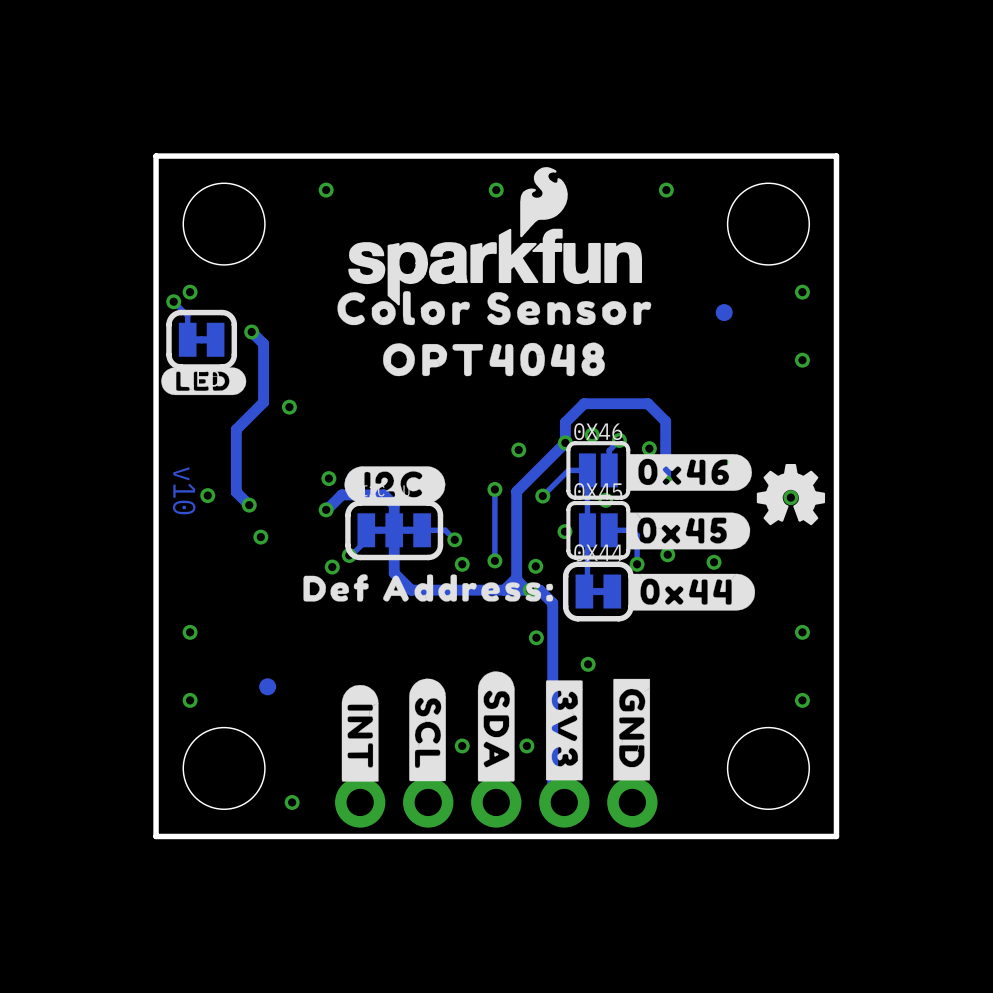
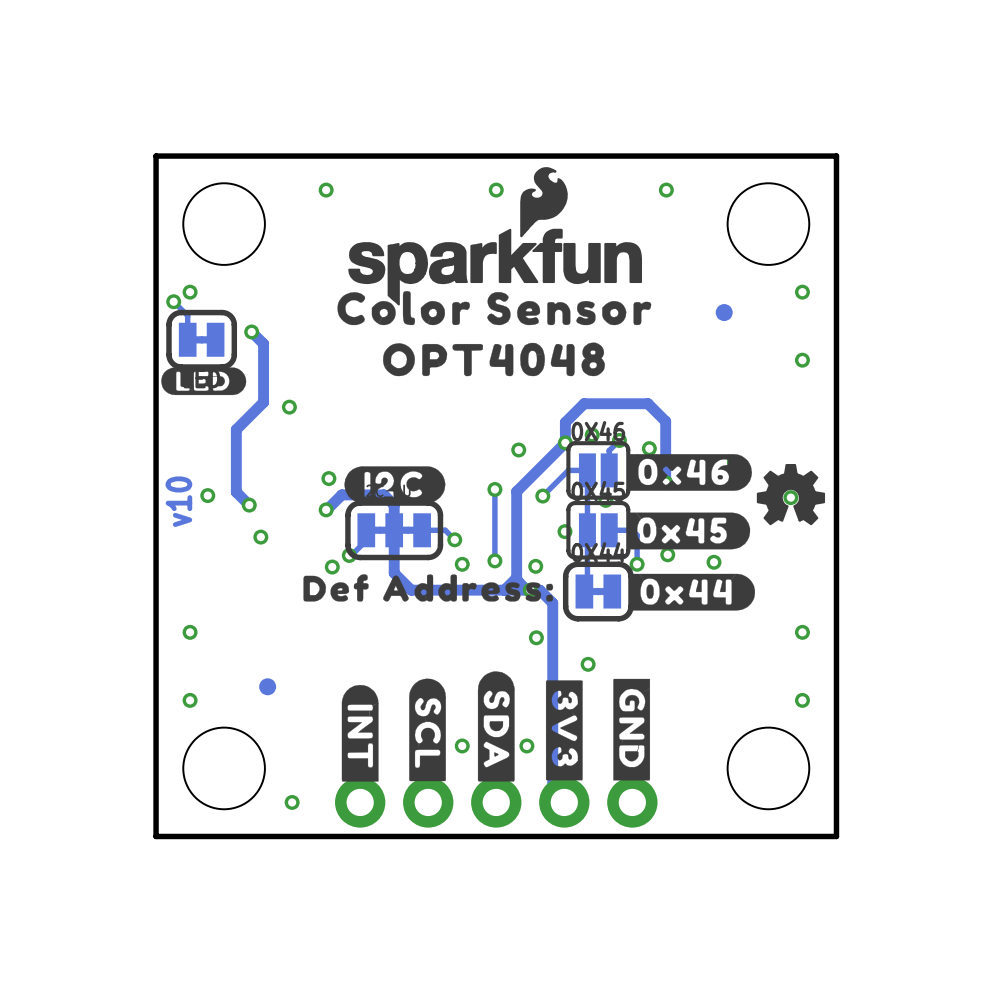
text rotation: 0° (184, 490) -> 180° (178, 501)

